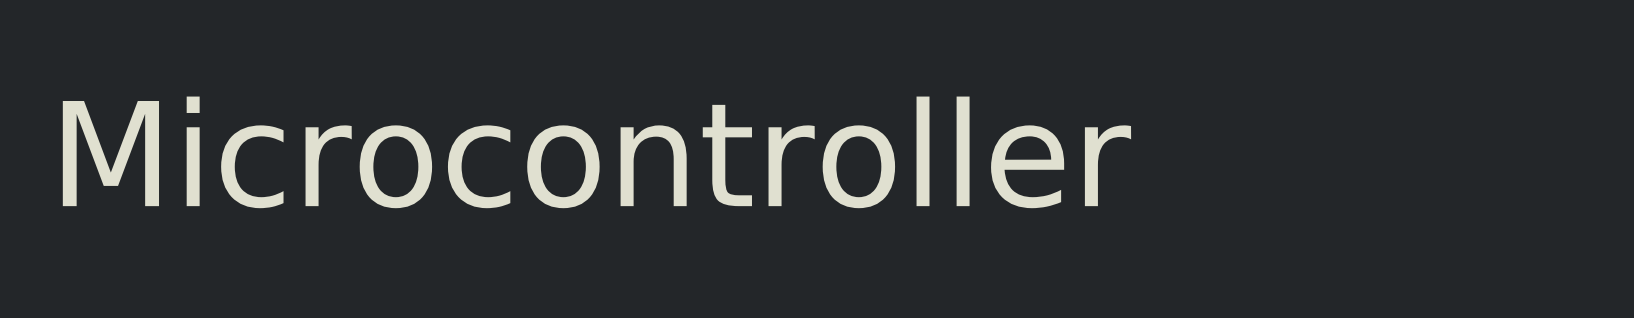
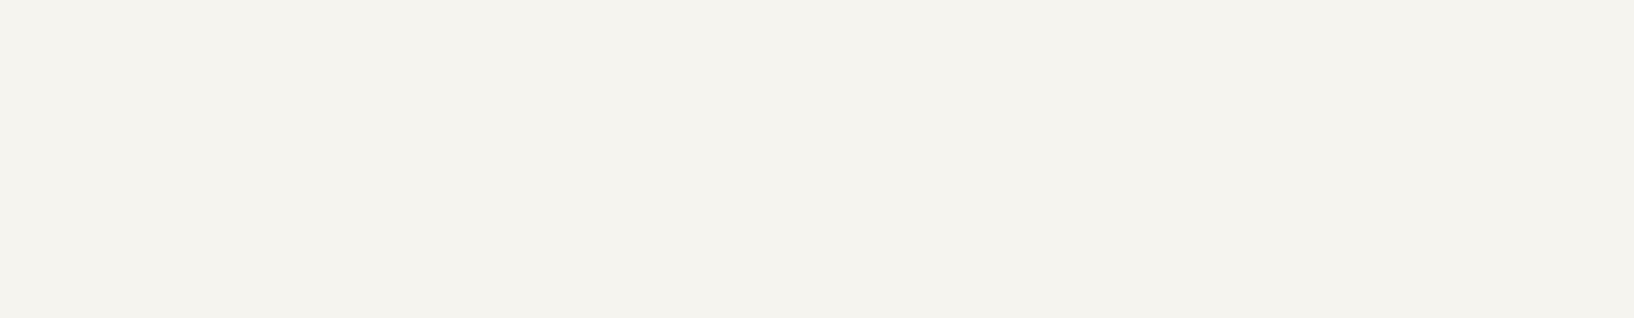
label: Microcontroller (596, 152) -> none

